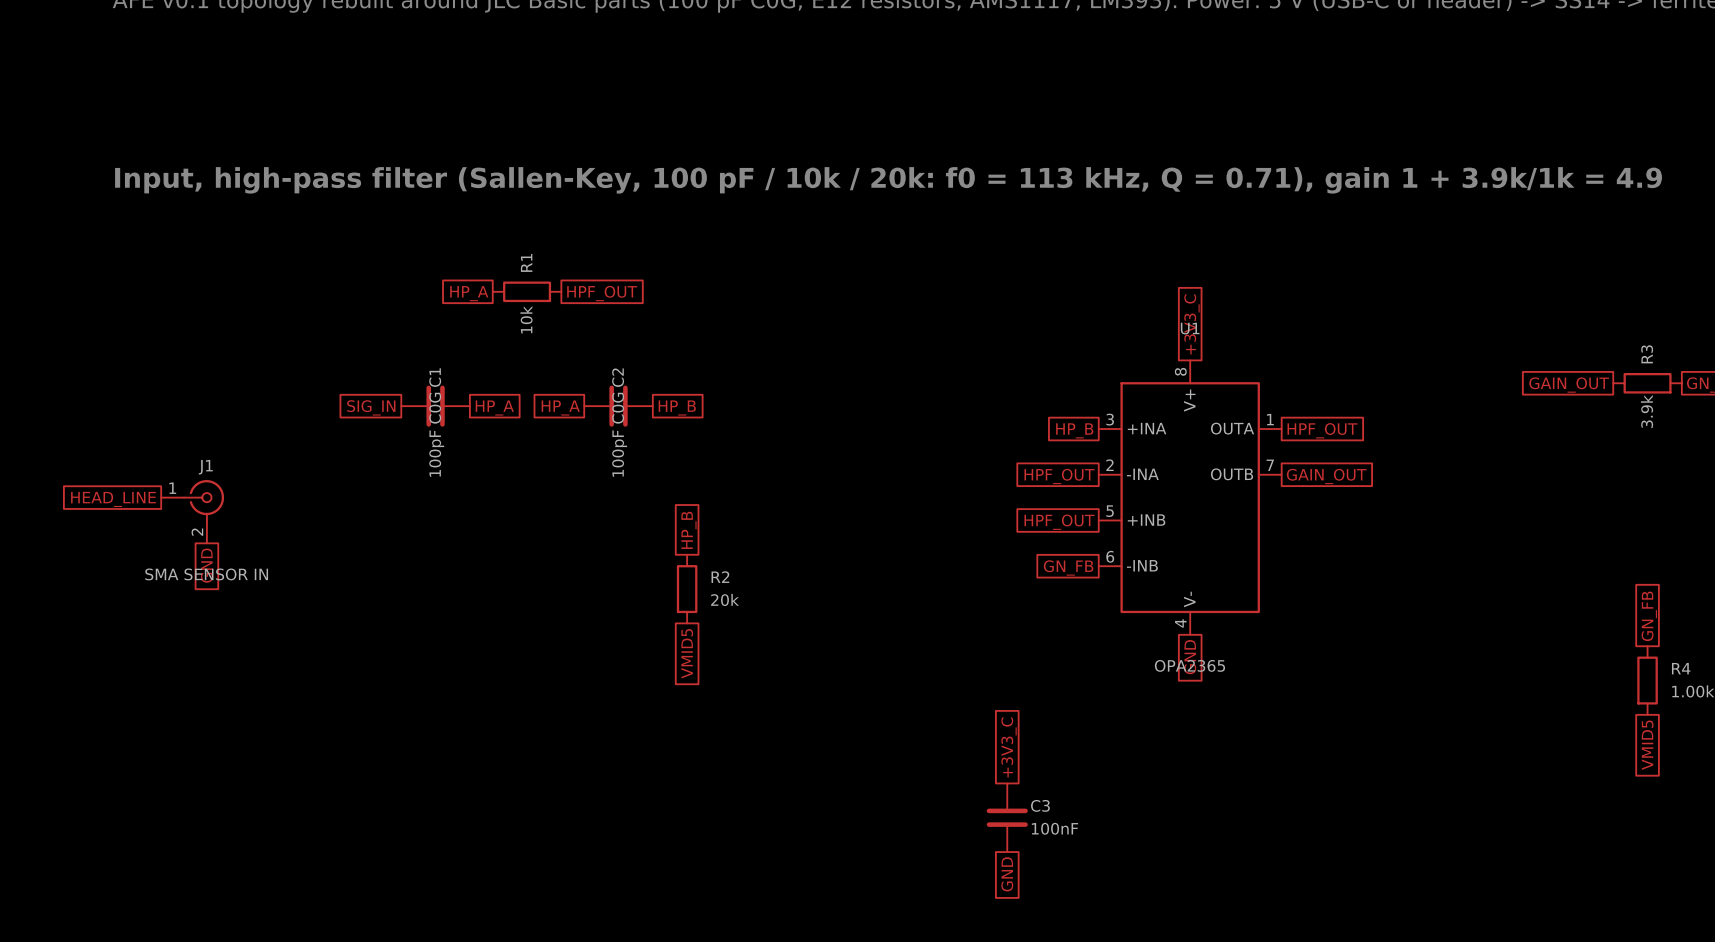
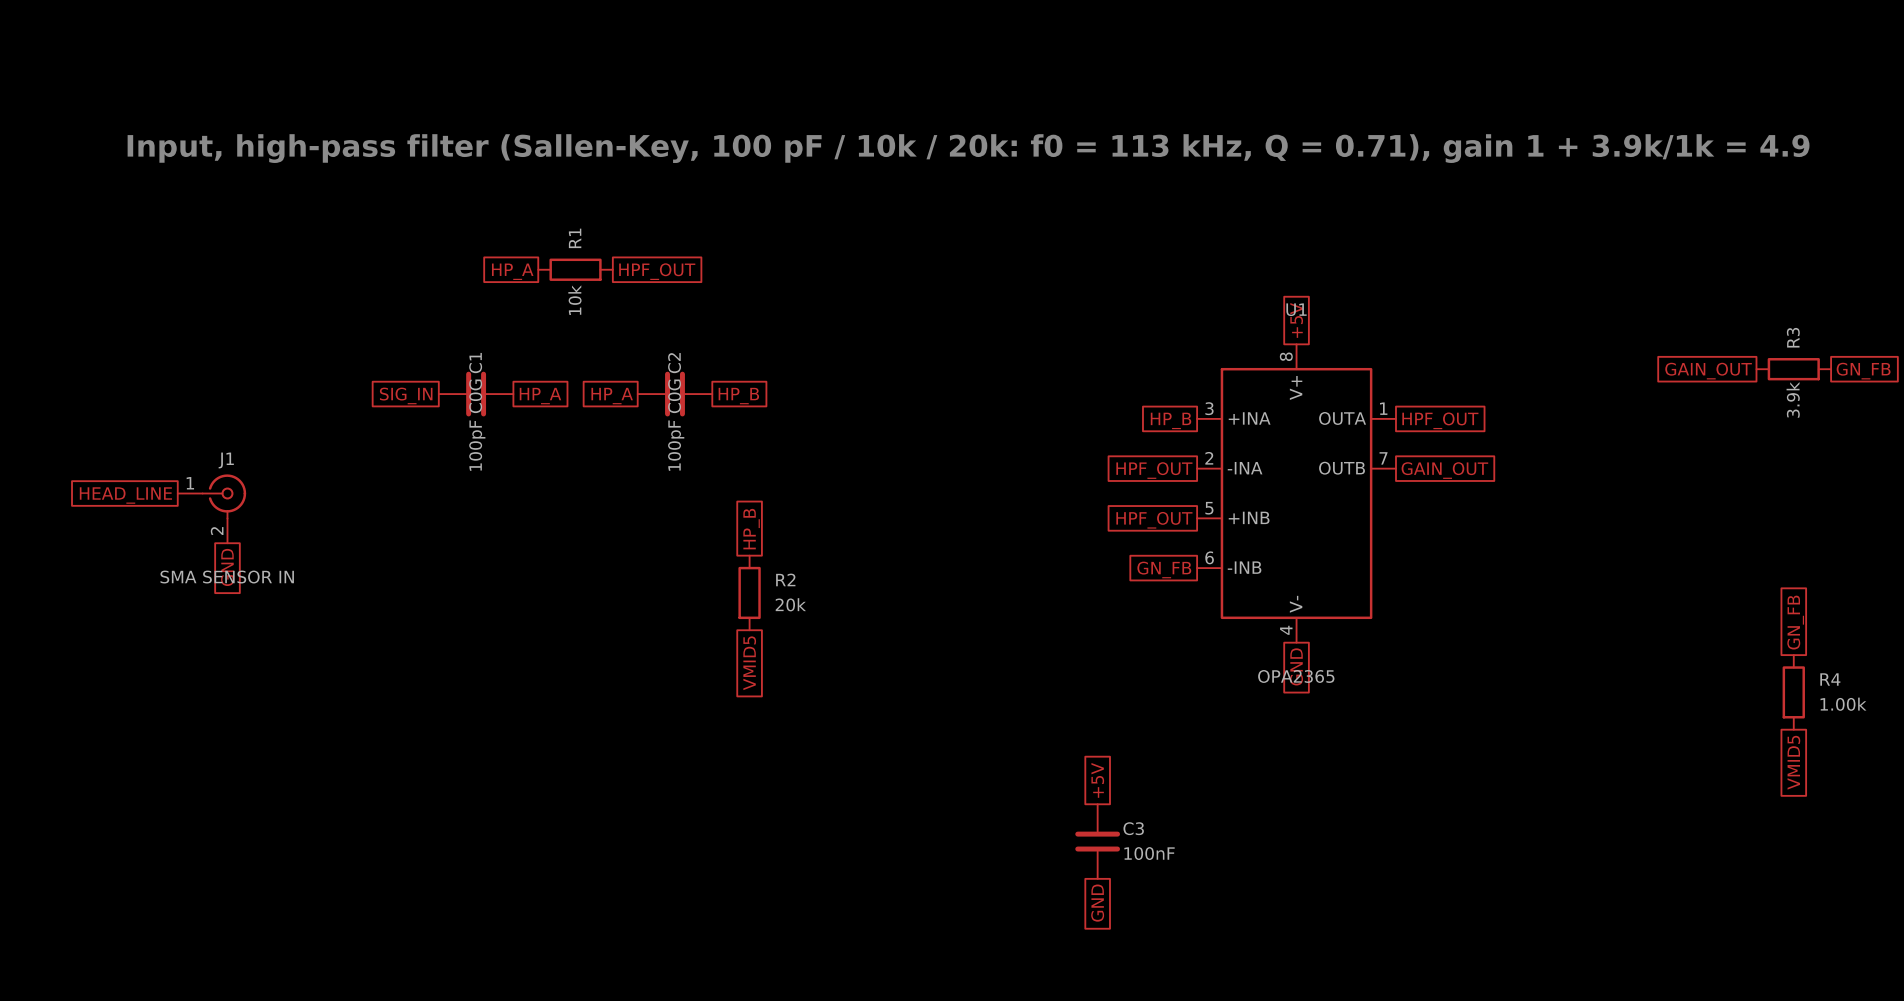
global label: +3V3_C (1191, 324) -> +5V (1296, 320)
global label: +3V3_C (1009, 747) -> +5V (1097, 780)

